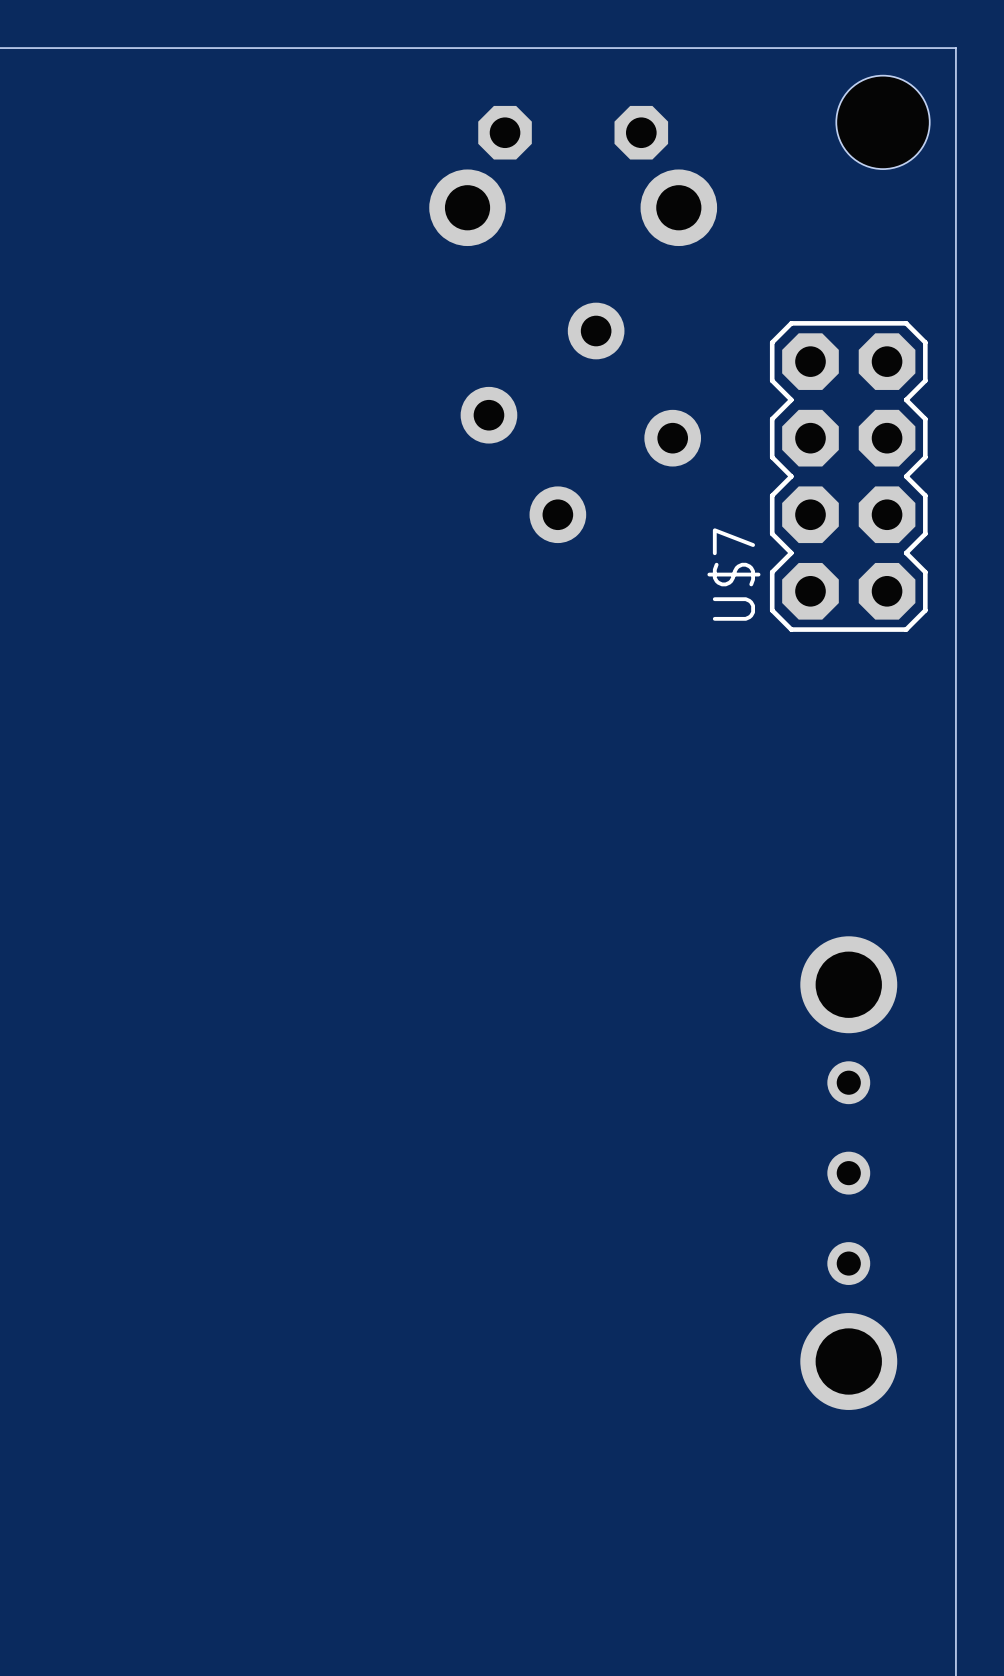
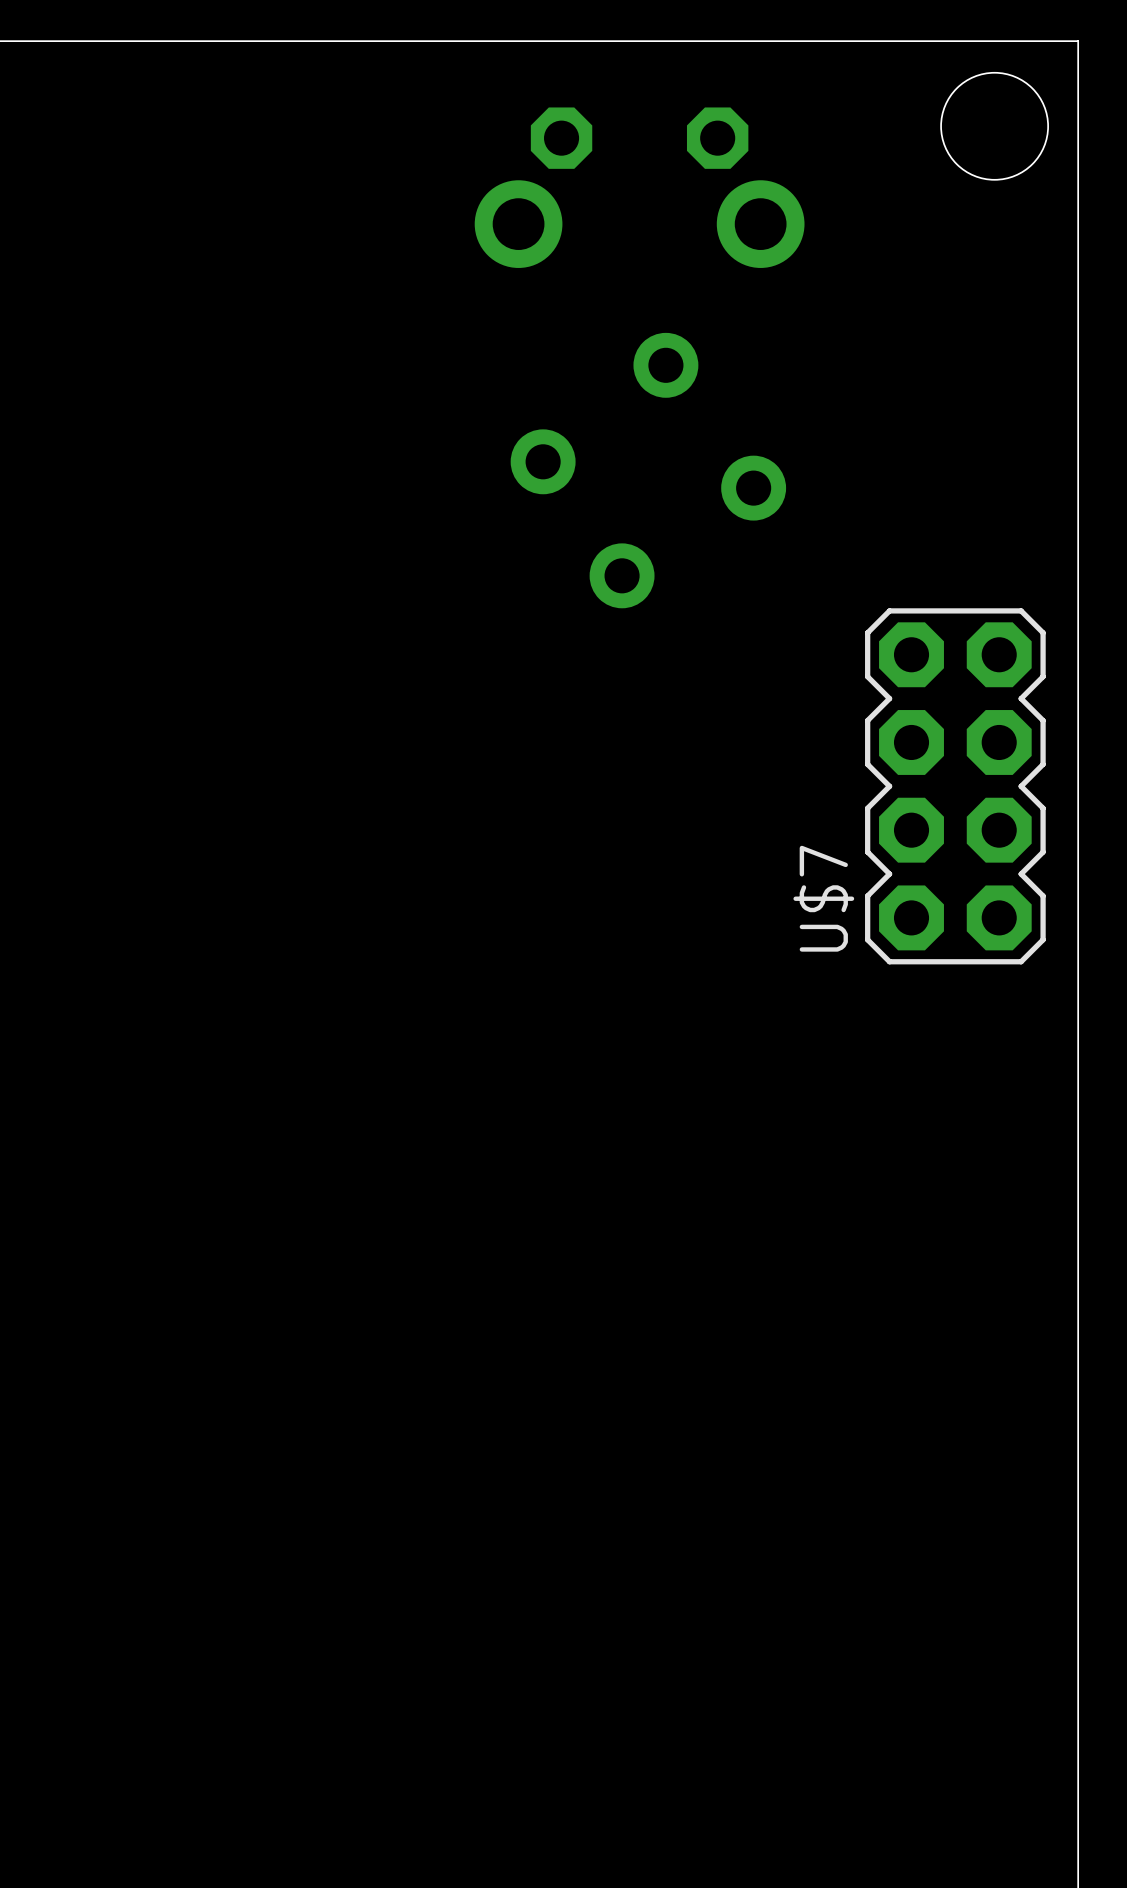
U$7 position: (848, 476) -> (955, 786)
part: (848, 1173) -> none

